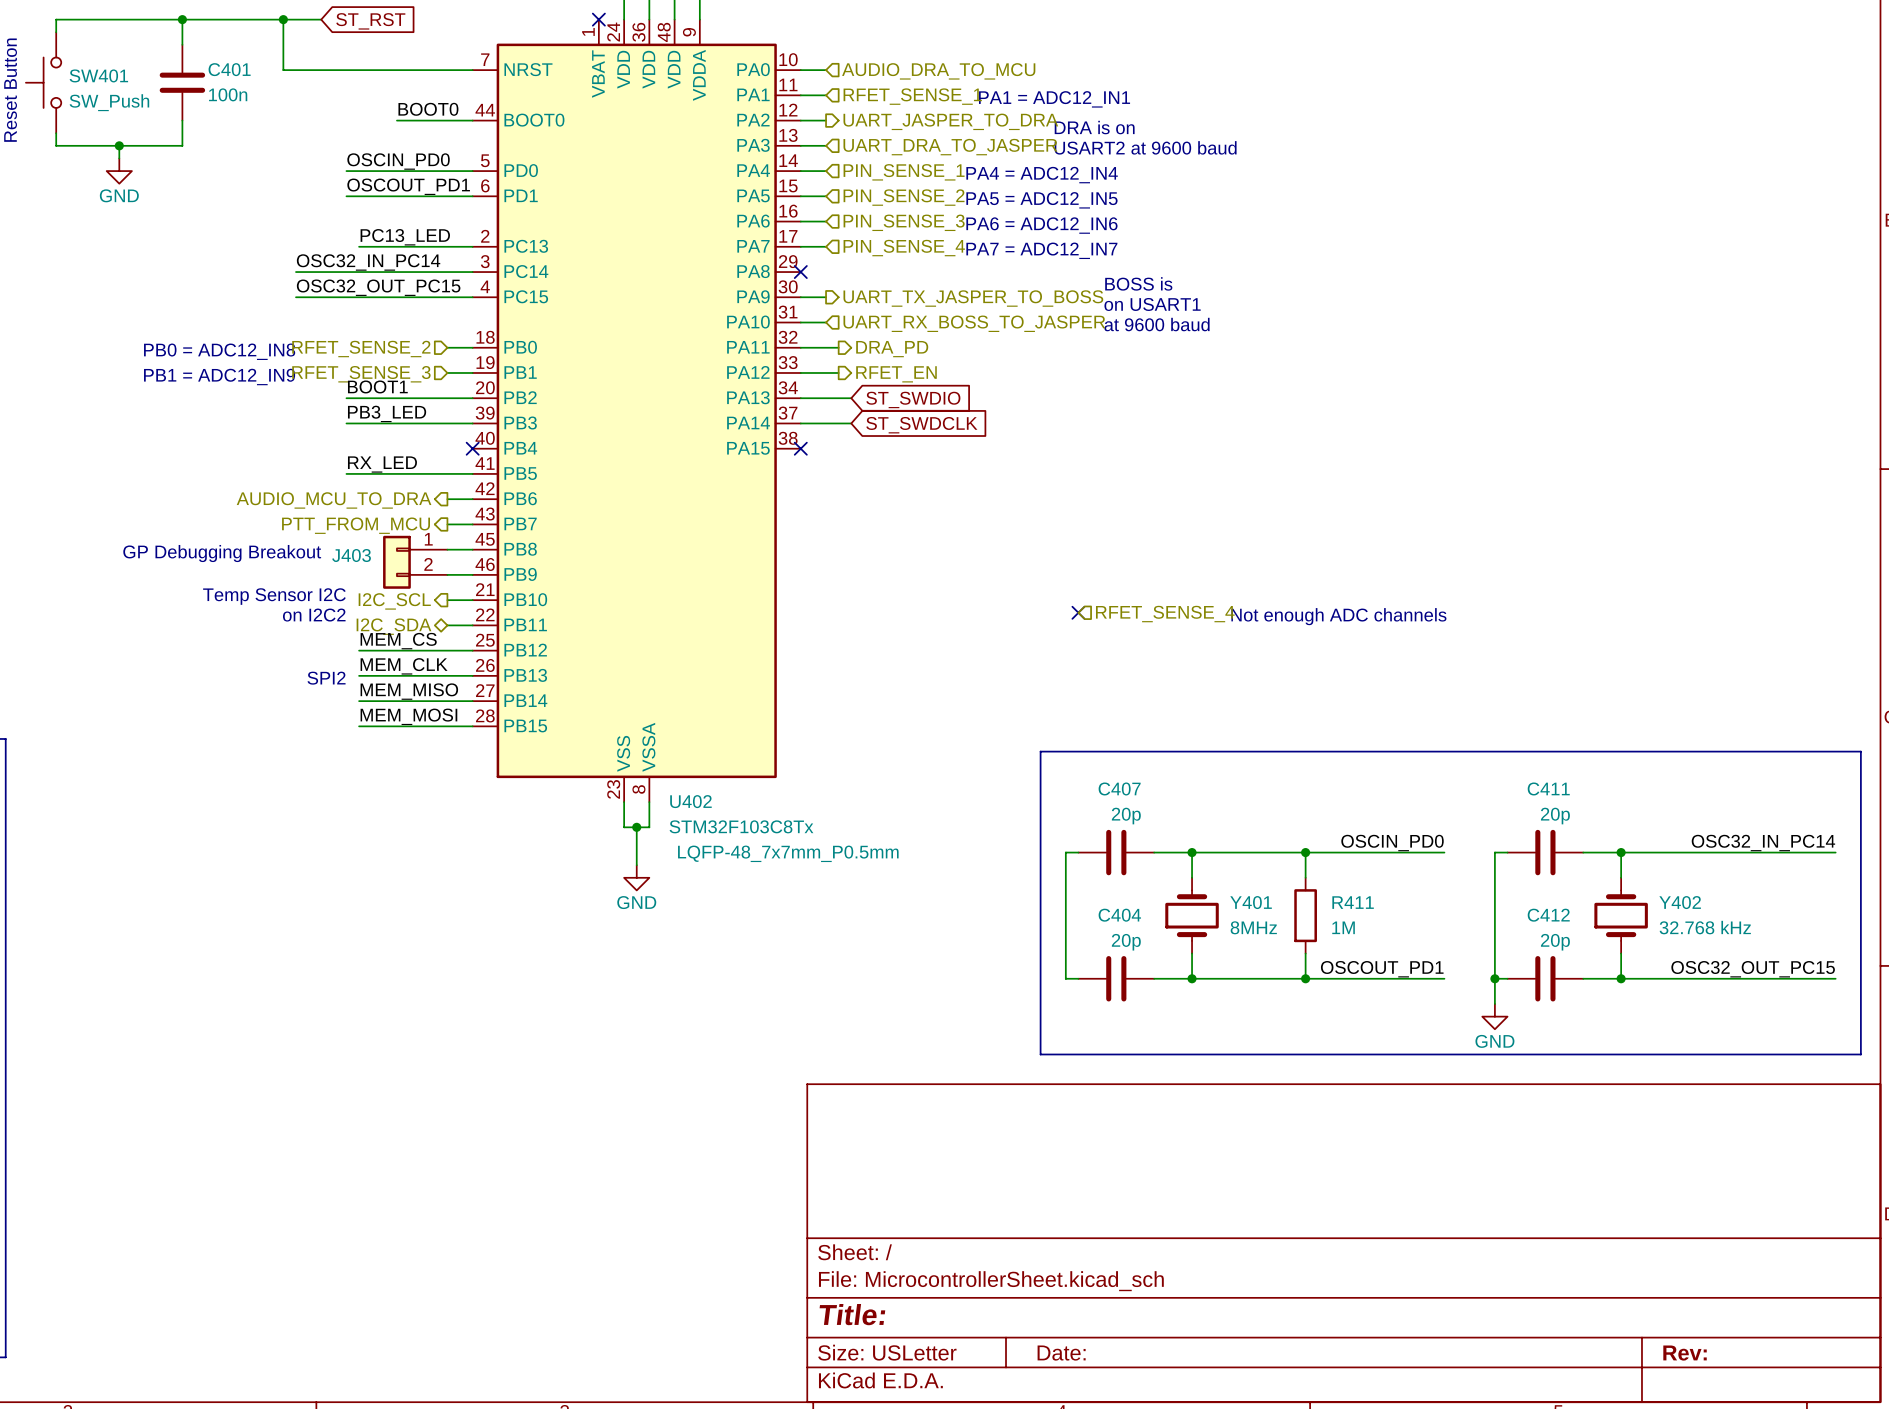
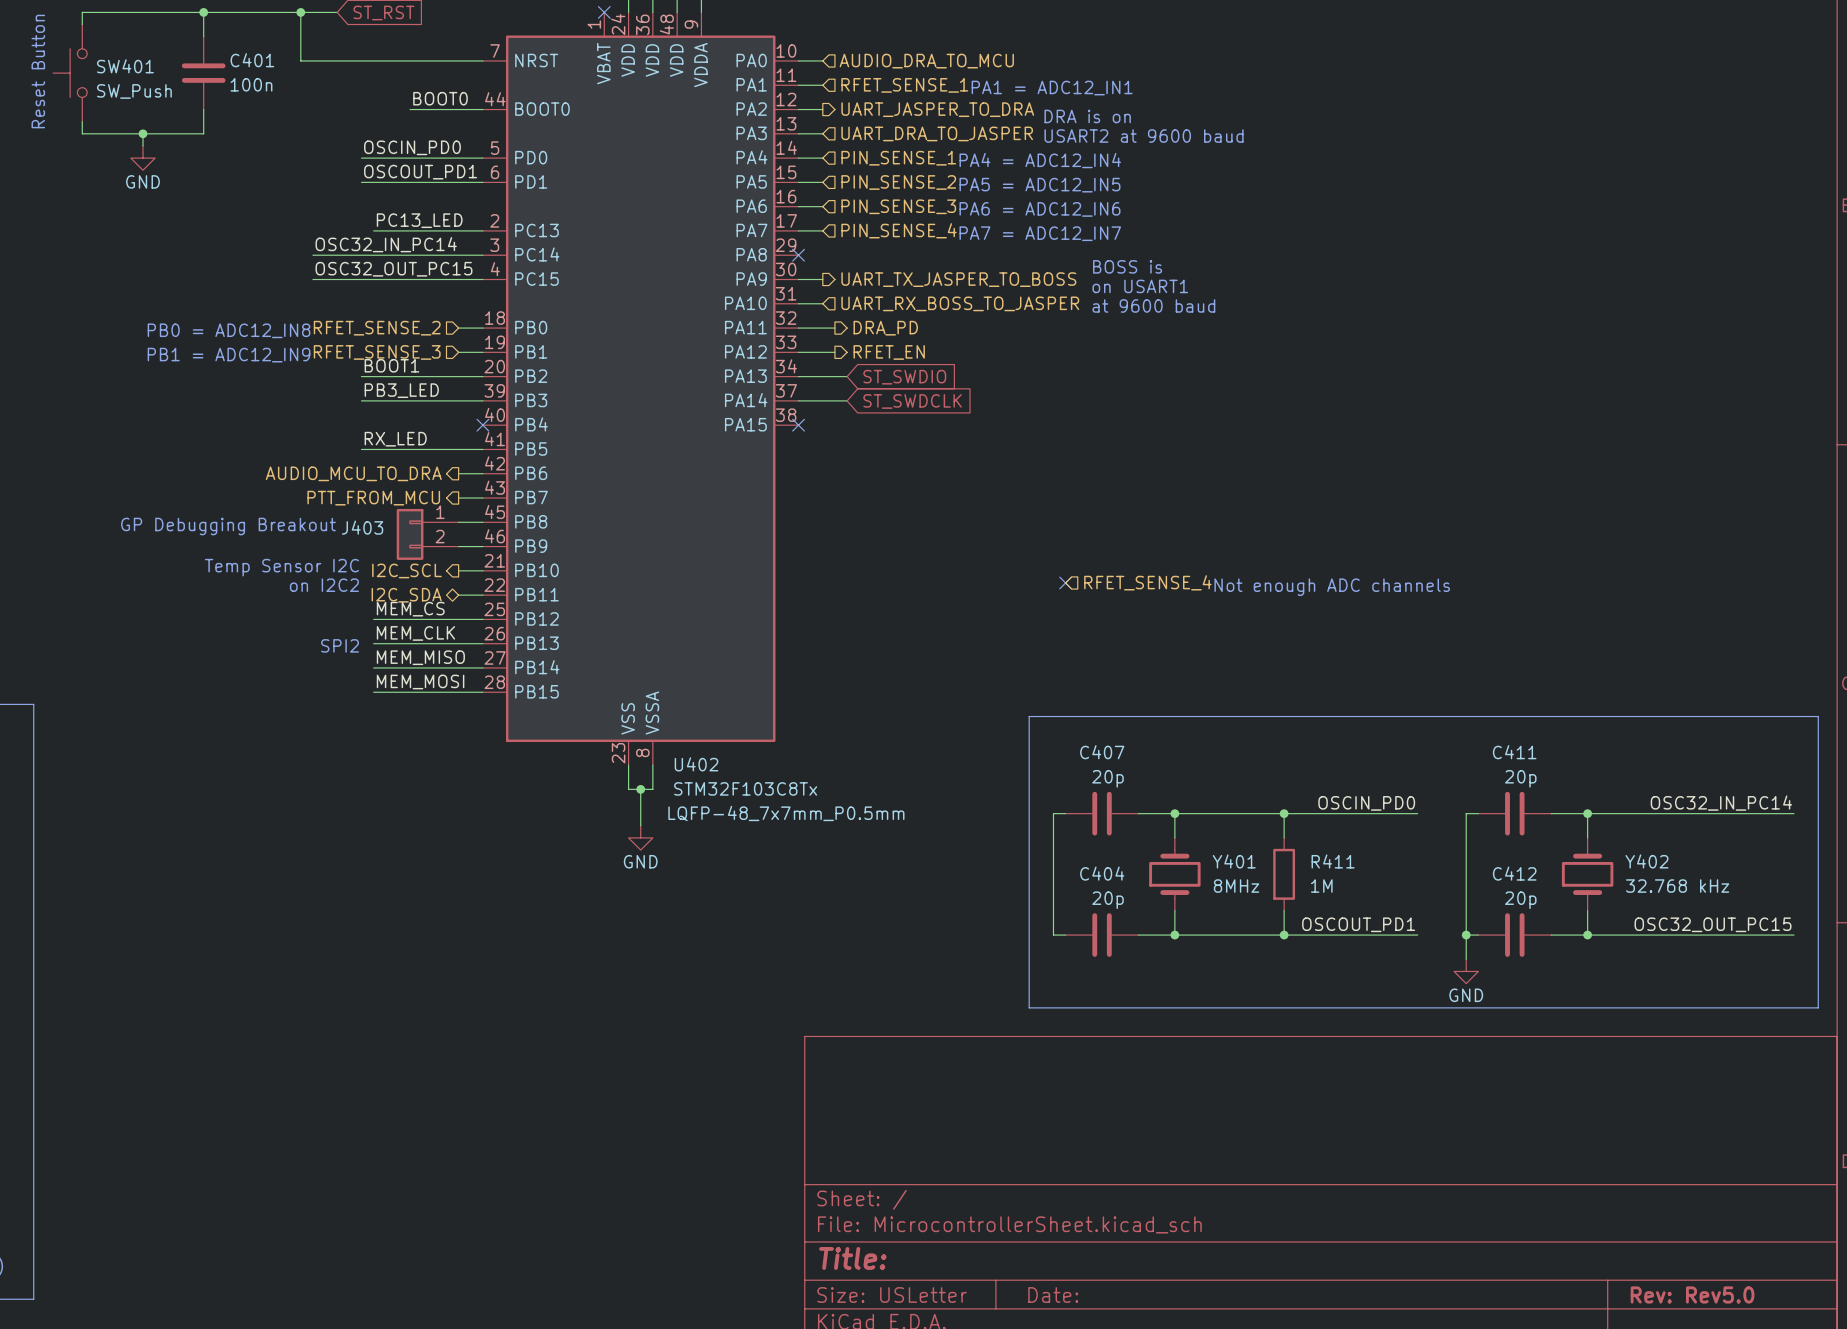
title block: Rev: (1685, 1353) -> Rev: Rev5.0 (1692, 1294)

